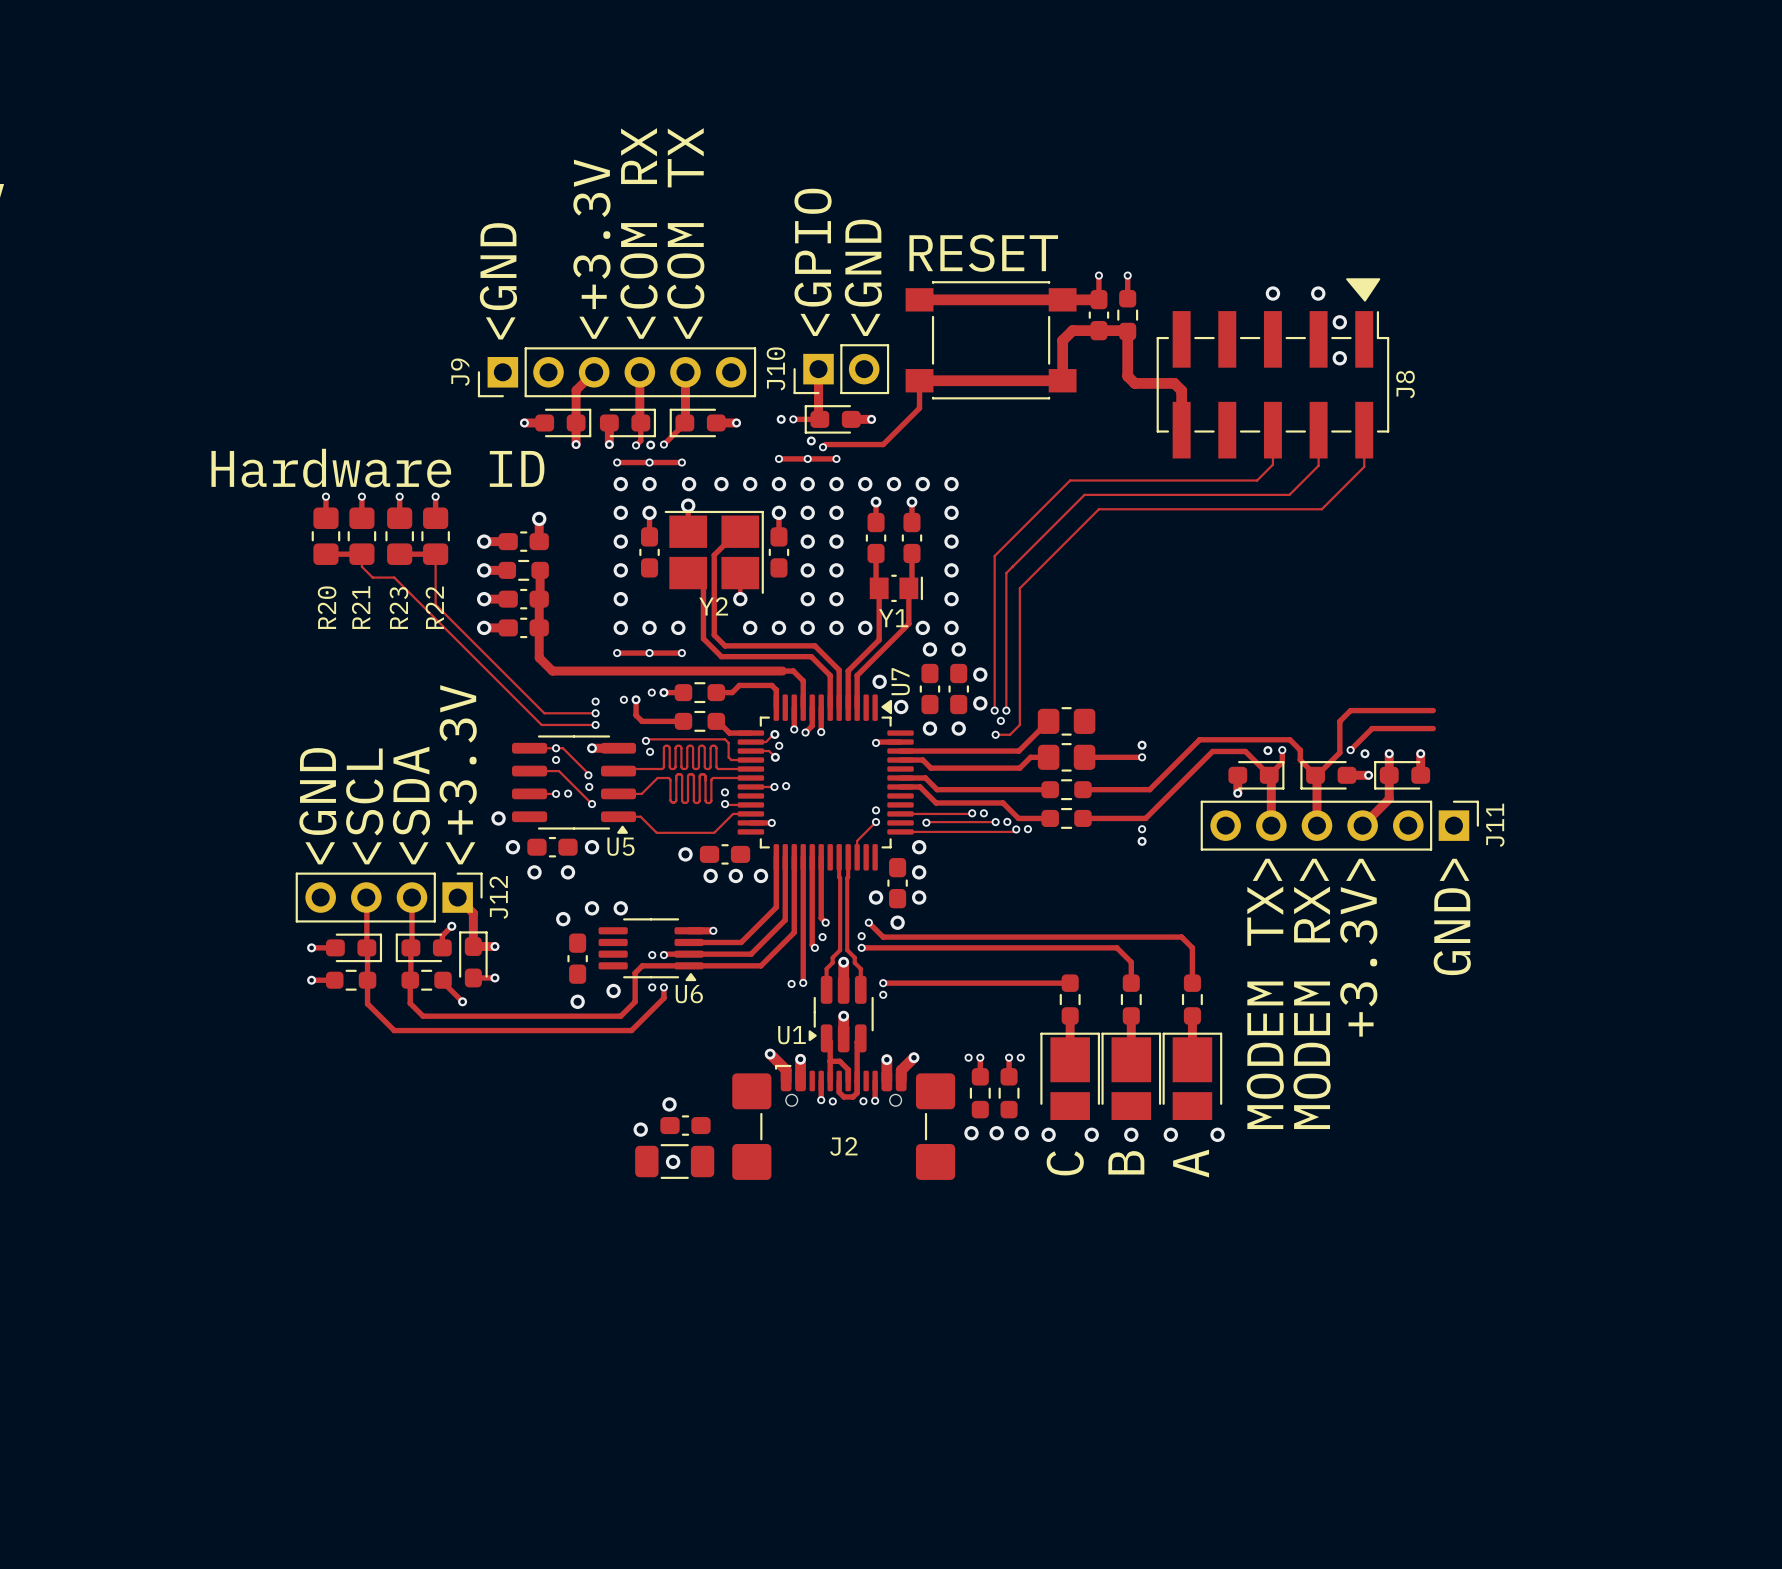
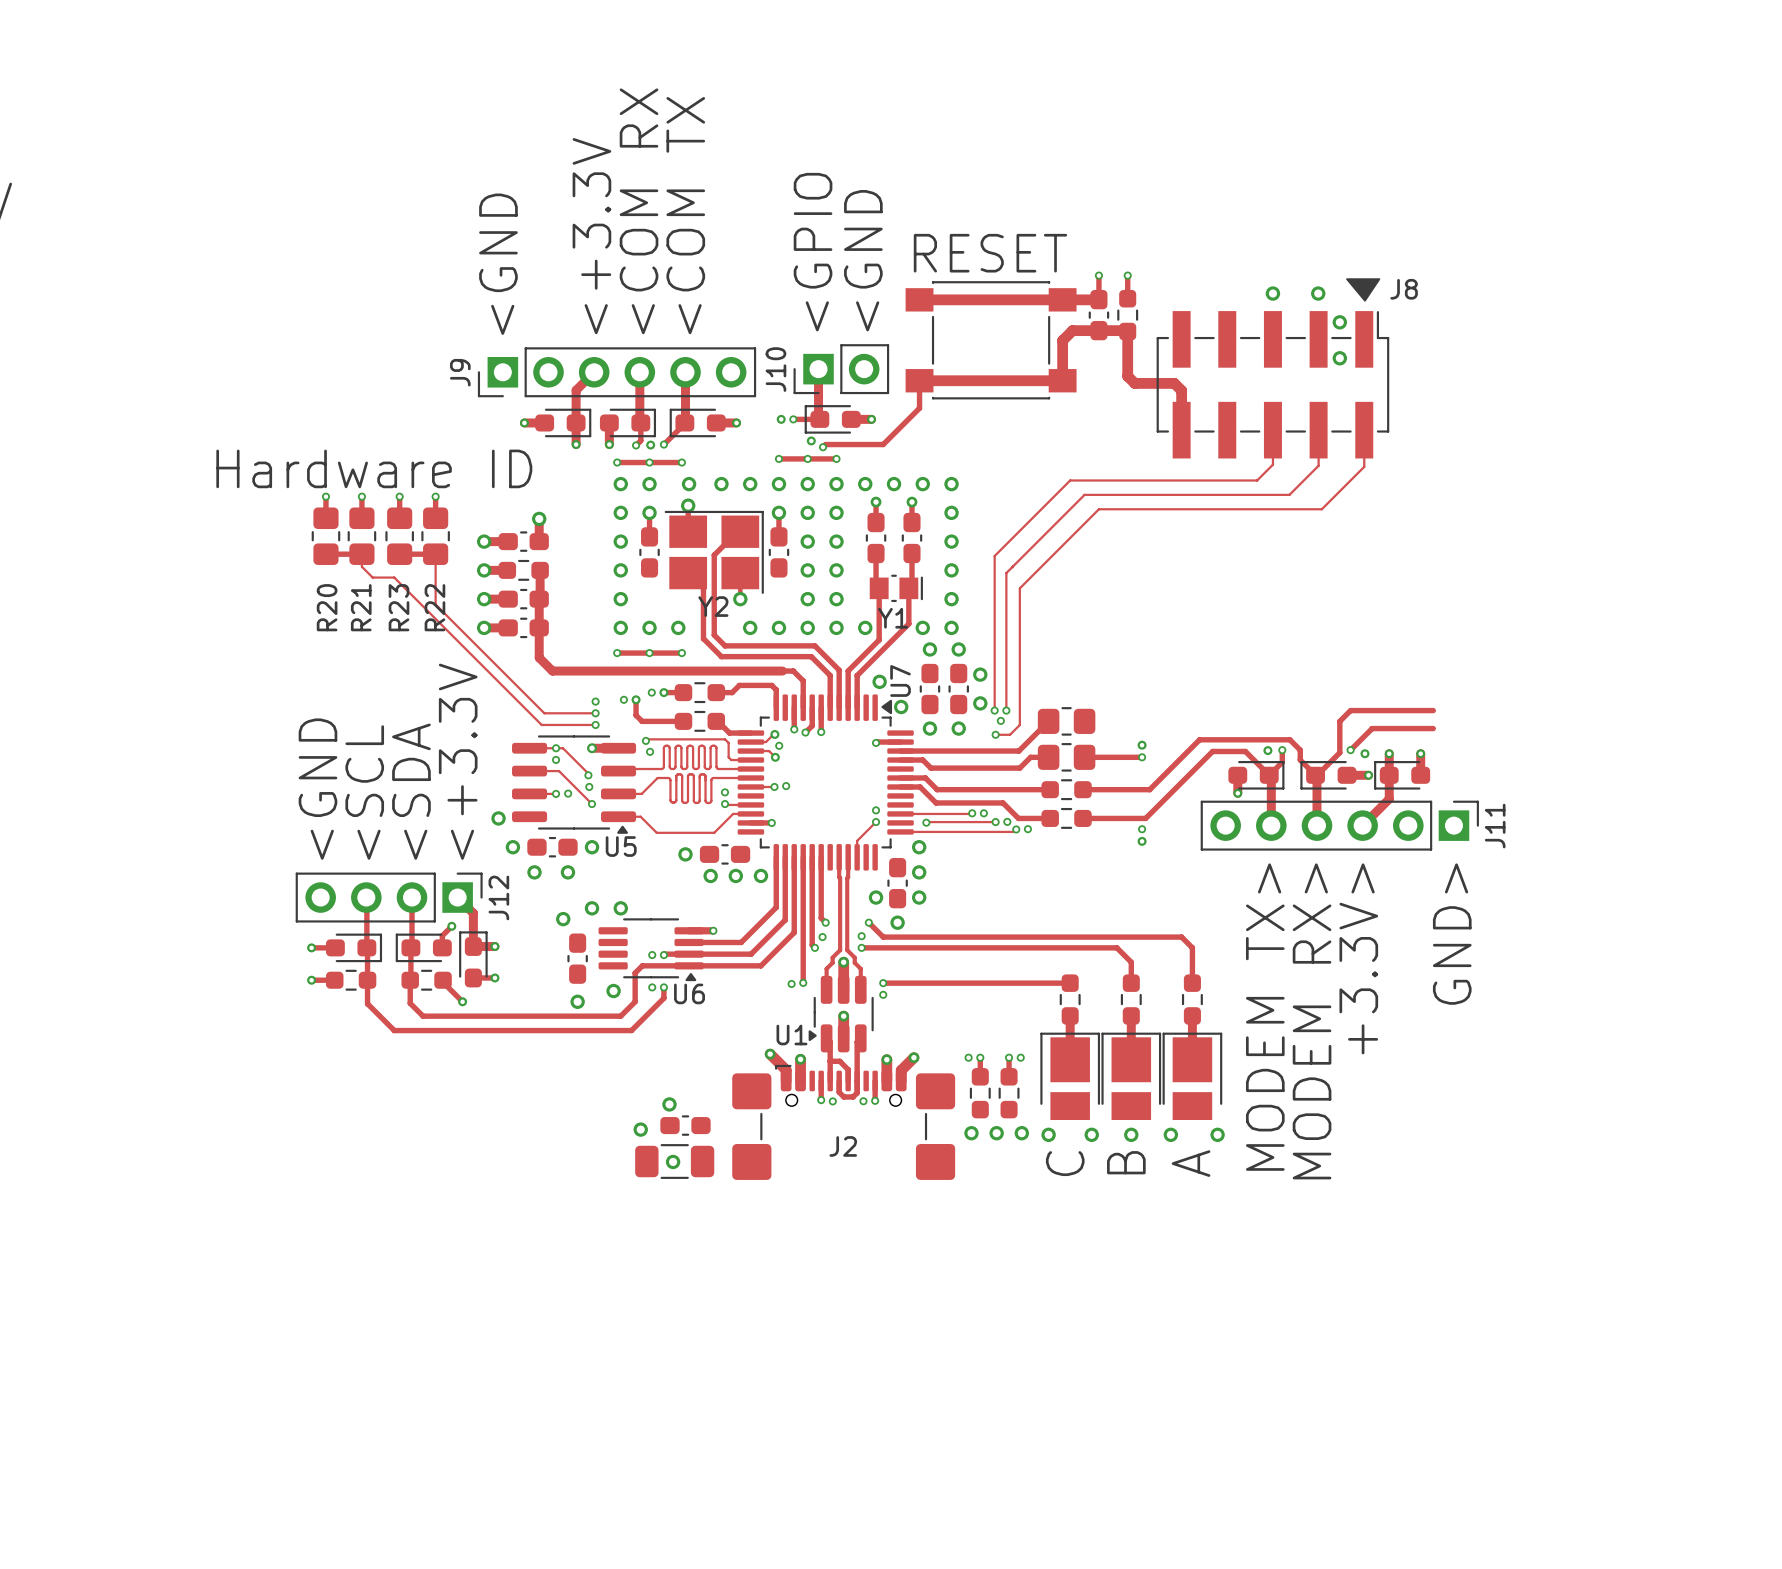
J8 name rotation: 0° (1405, 384) -> 90° clockwise (1404, 289)
J8 name position: J8 (1405, 384) -> J8 (1404, 289)

